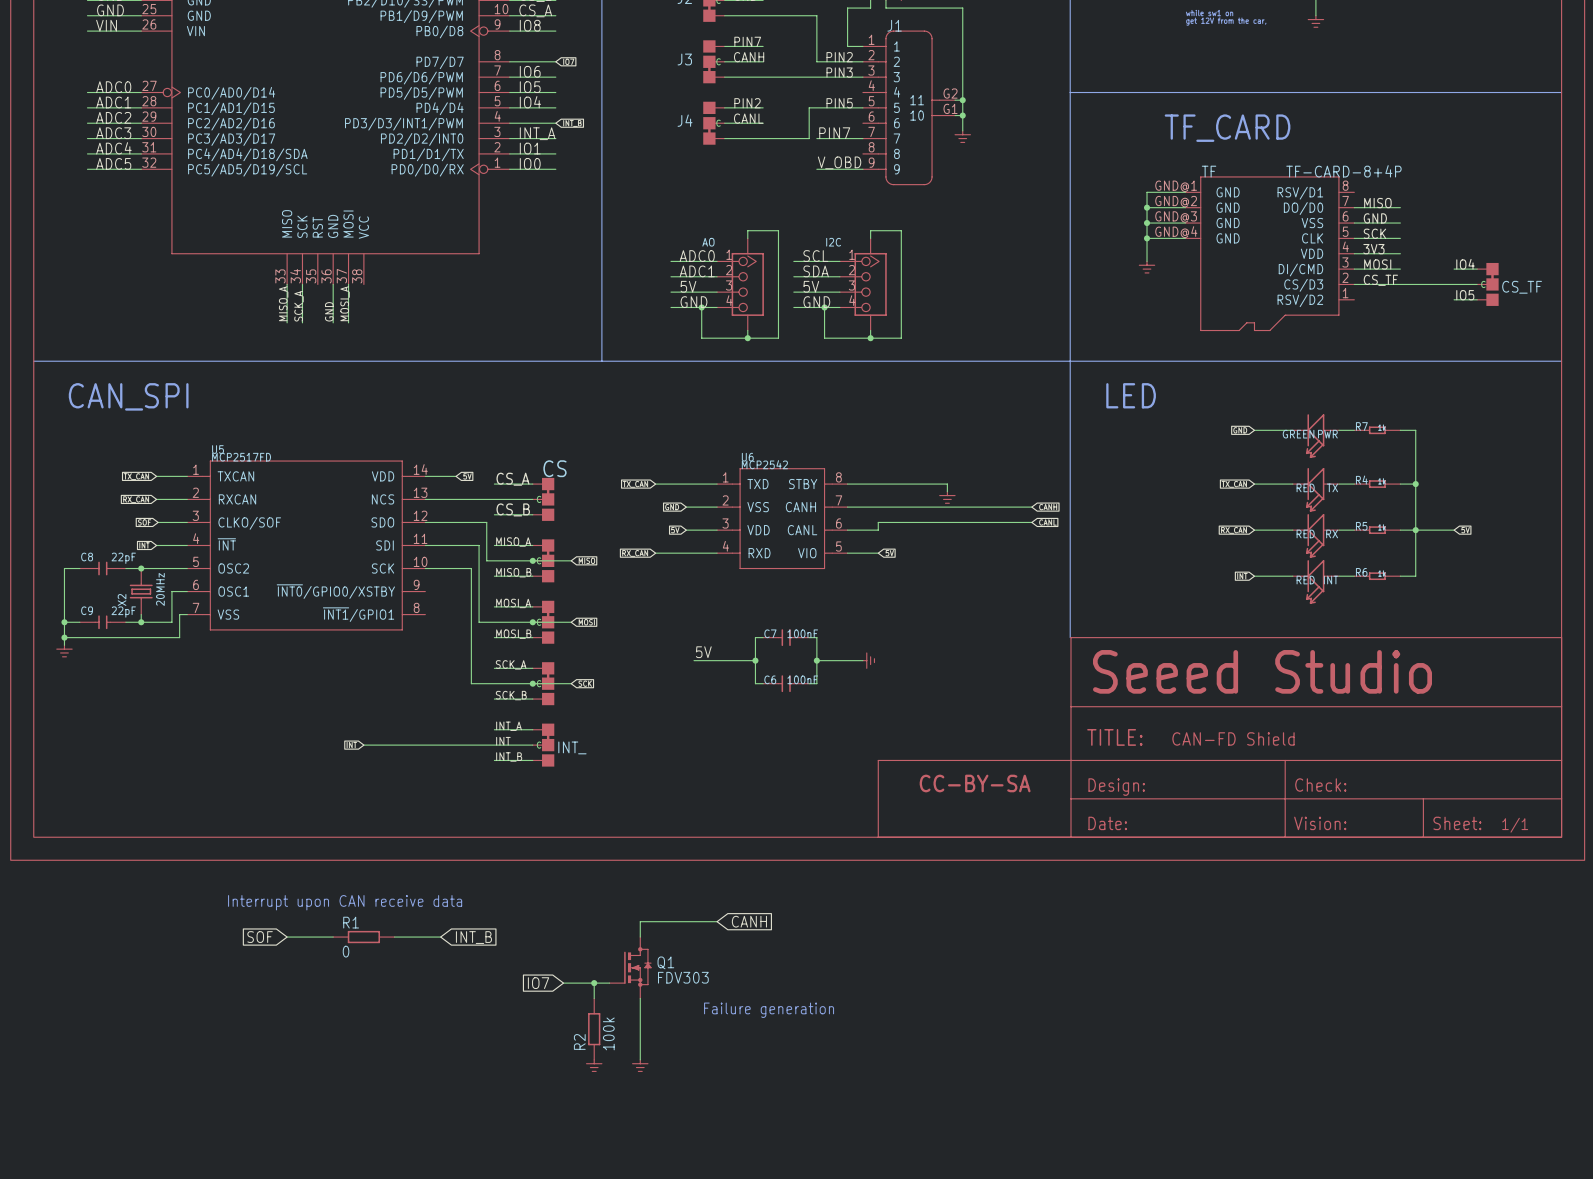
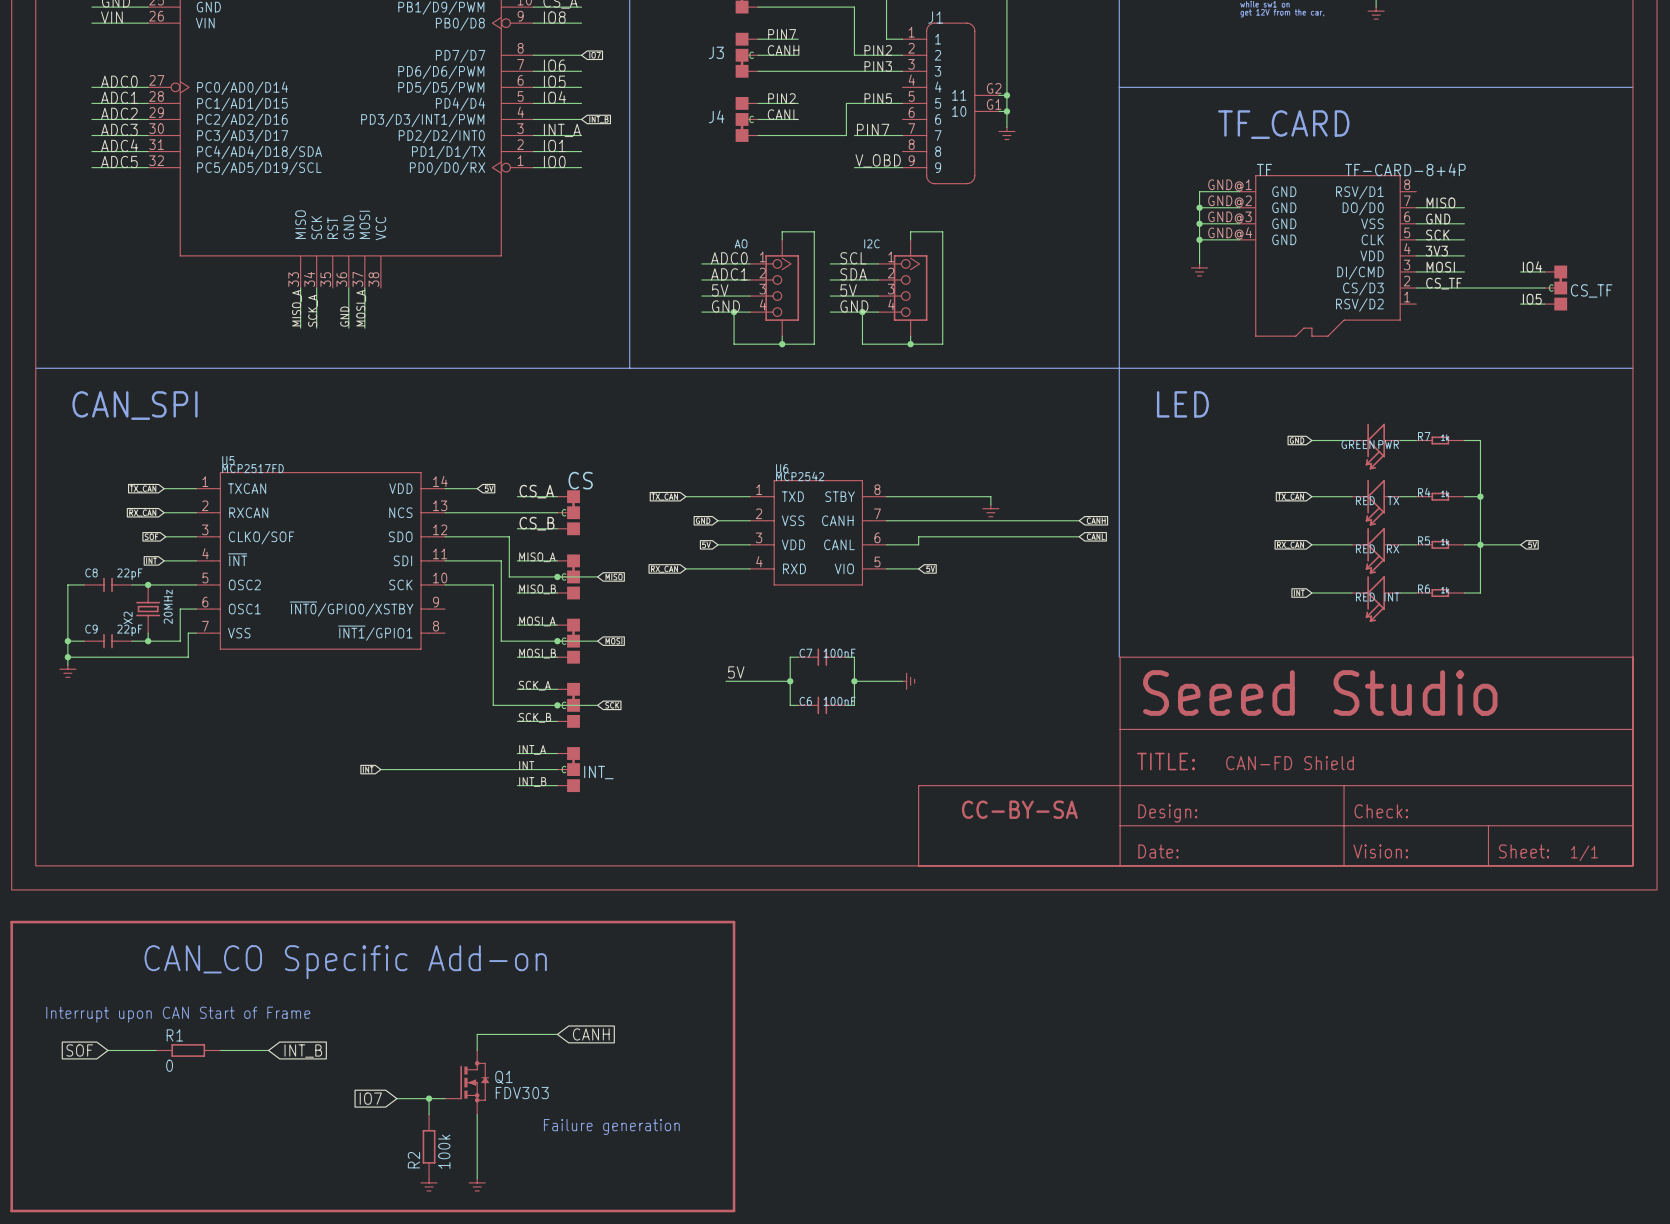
line: none -> (11, 922) (734, 922) (734, 1211) (11, 1211) (11, 922)
text: Interrupt upon CAN receive data (345, 902) -> none
wire: (717, 921) (640, 921) (640, 937) -> none
global label: CANH (749, 921) -> none
text: none -> CAN_CO Specific Add-on (345, 962)
global label: SOF (260, 937) -> none
wire: (287, 937) (333, 937) -> (220, 1050) (268, 1050)
R1 position: (363, 937) -> (188, 1050)
wire: (394, 937) (440, 937) -> (396, 1098) (445, 1098)
global label: INT_B (473, 937) -> none
Q1 position: (630, 967) -> (467, 1082)
text: none -> Interrupt upon CAN Start of Frame (178, 1014)
global label: IO7 (538, 983) -> none
wire: (563, 983) (609, 983) -> none
wire: (594, 983) (594, 998) -> none
junction: (594, 983) -> none
wire: none -> (557, 1034) (477, 1034) (477, 1050)
global label: none -> CANH (591, 1034)
wire: (640, 998) (640, 1059) -> none
text: Failure generation (769, 1010) -> none
global label: none -> SOF (79, 1050)
wire: none -> (108, 1050) (156, 1050)
global label: none -> INT_B (303, 1051)
R2 position: (594, 1029) -> (429, 1146)
global label: none -> IO7 (370, 1098)
wire: none -> (429, 1098) (429, 1114)
junction: none -> (429, 1098)
power symbol: (594, 1065) -> none
power symbol: (640, 1065) -> none
wire: none -> (477, 1114) (477, 1178)
text: none -> Failure generation (611, 1127)
power symbol: none -> (429, 1184)
power symbol: none -> (477, 1184)

